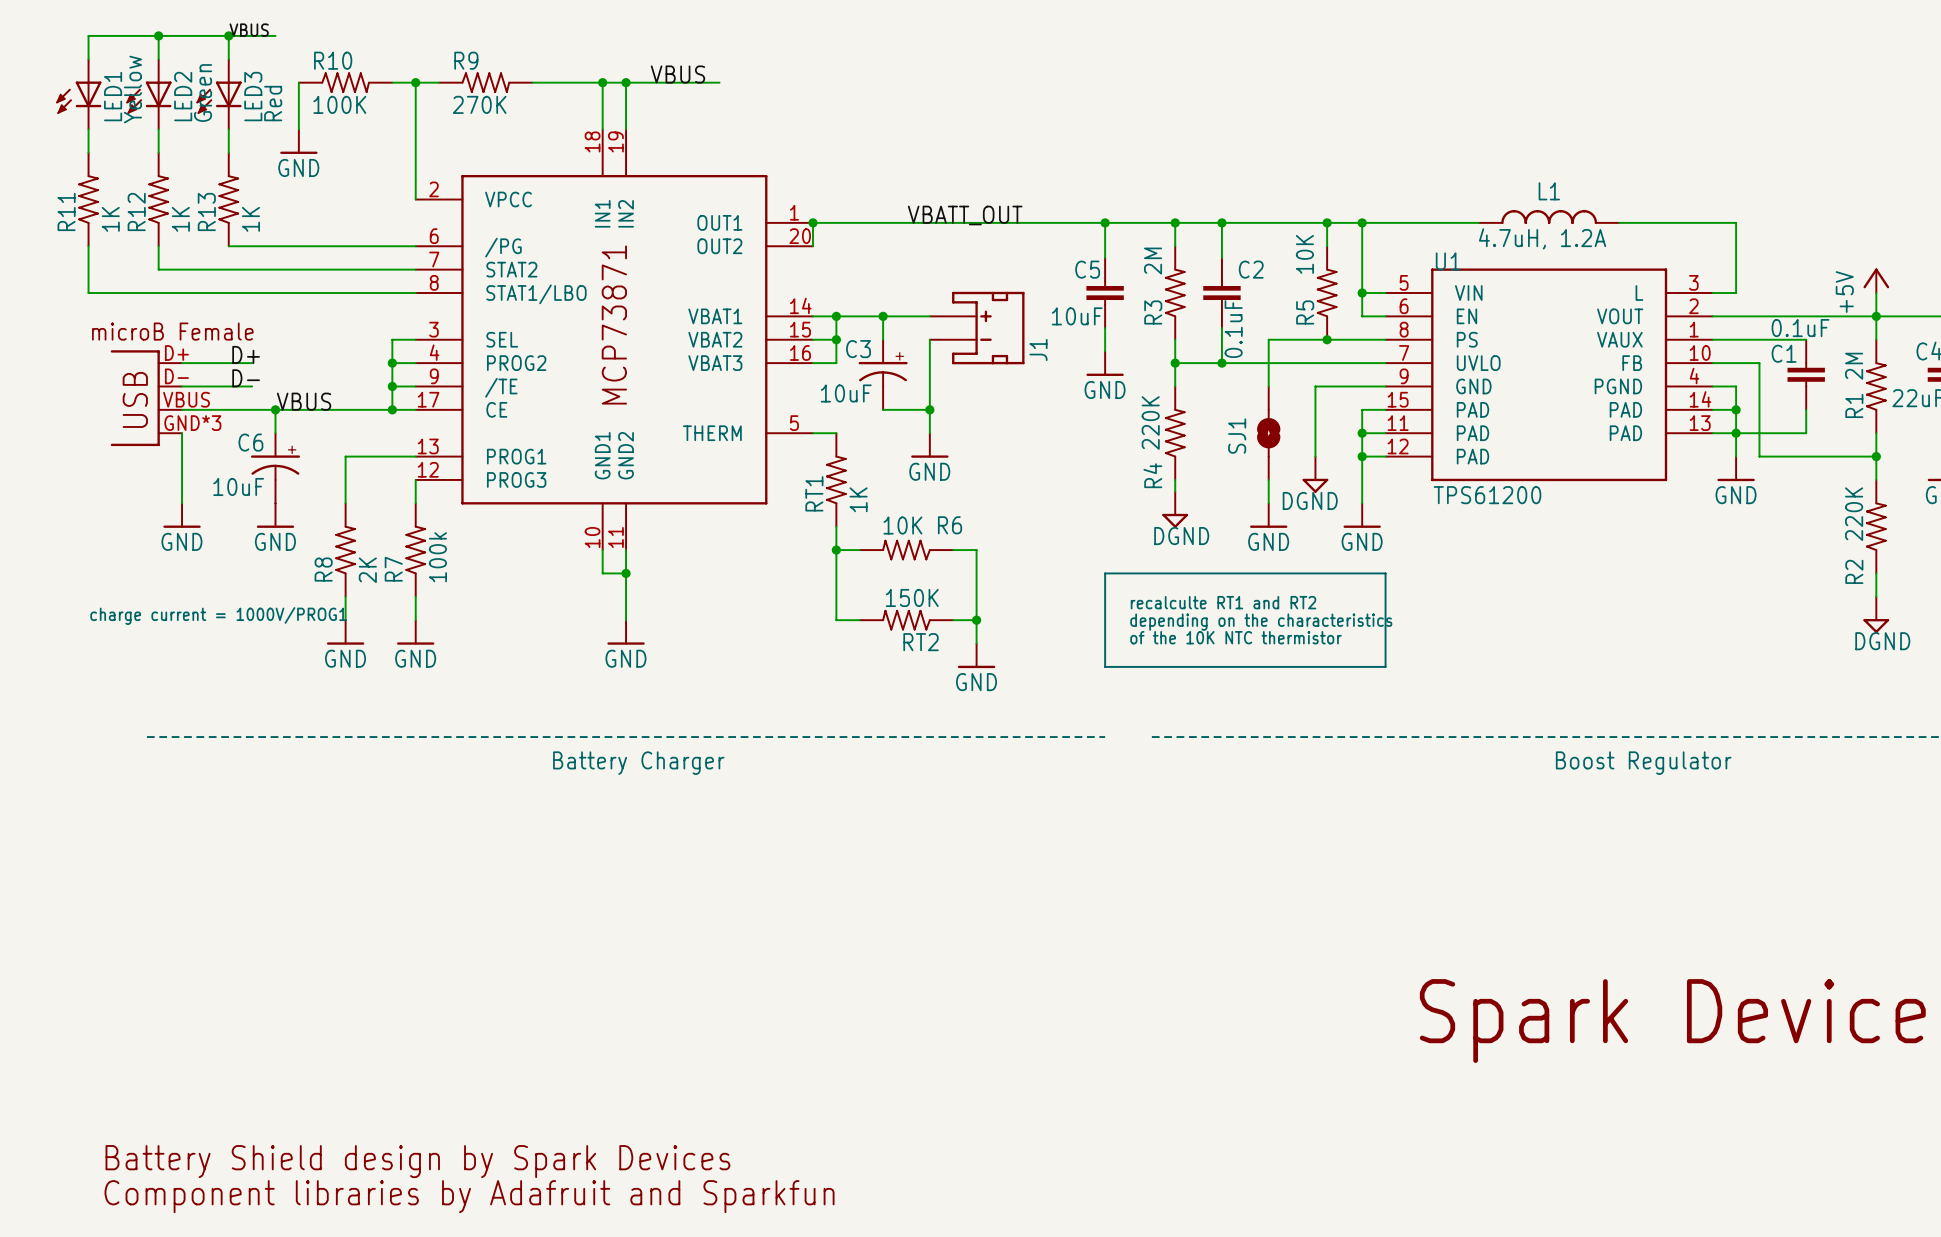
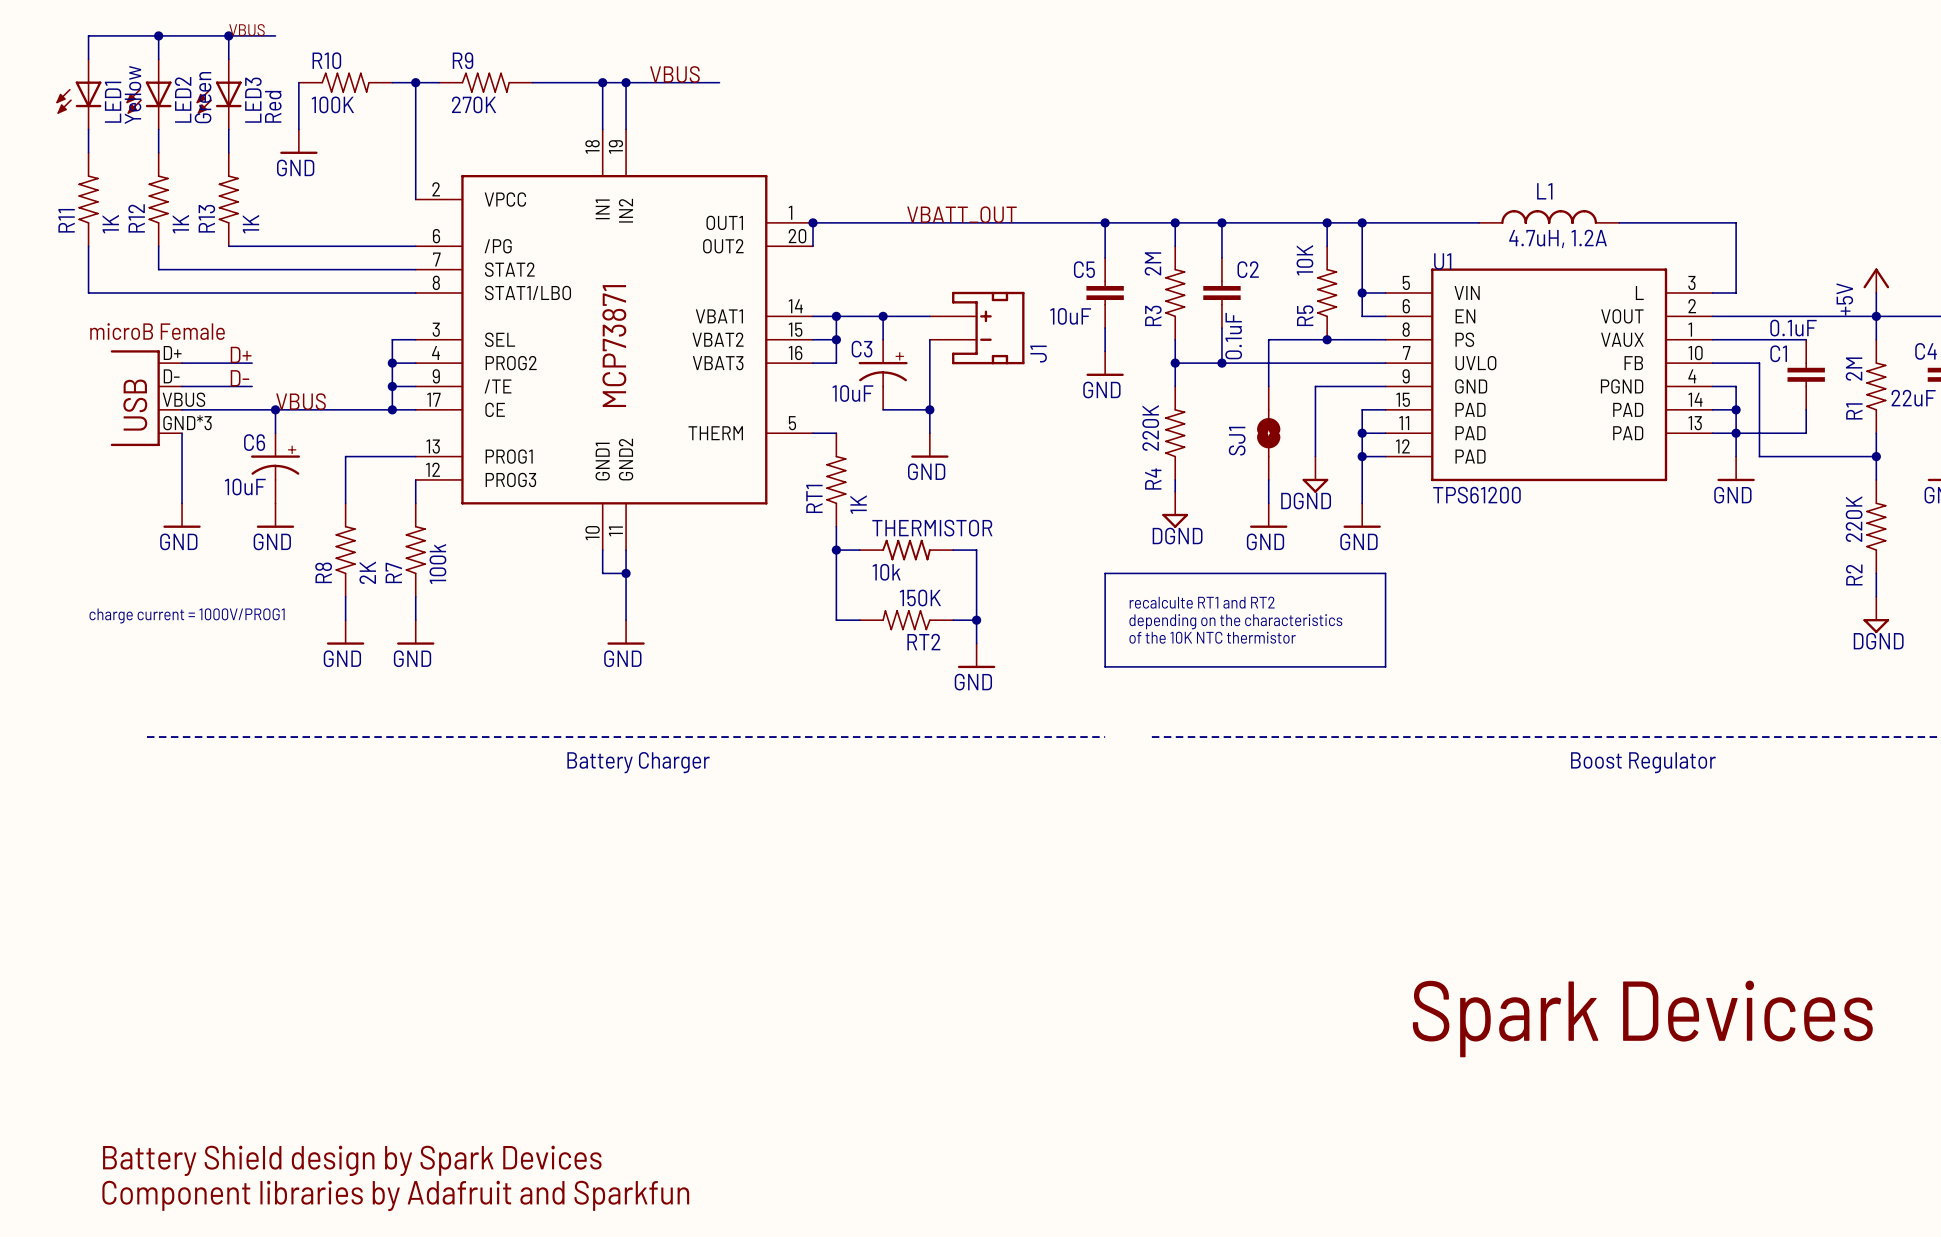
R6: 10K (906, 550) -> none
THERMISTOR: none -> 10k (906, 550)

